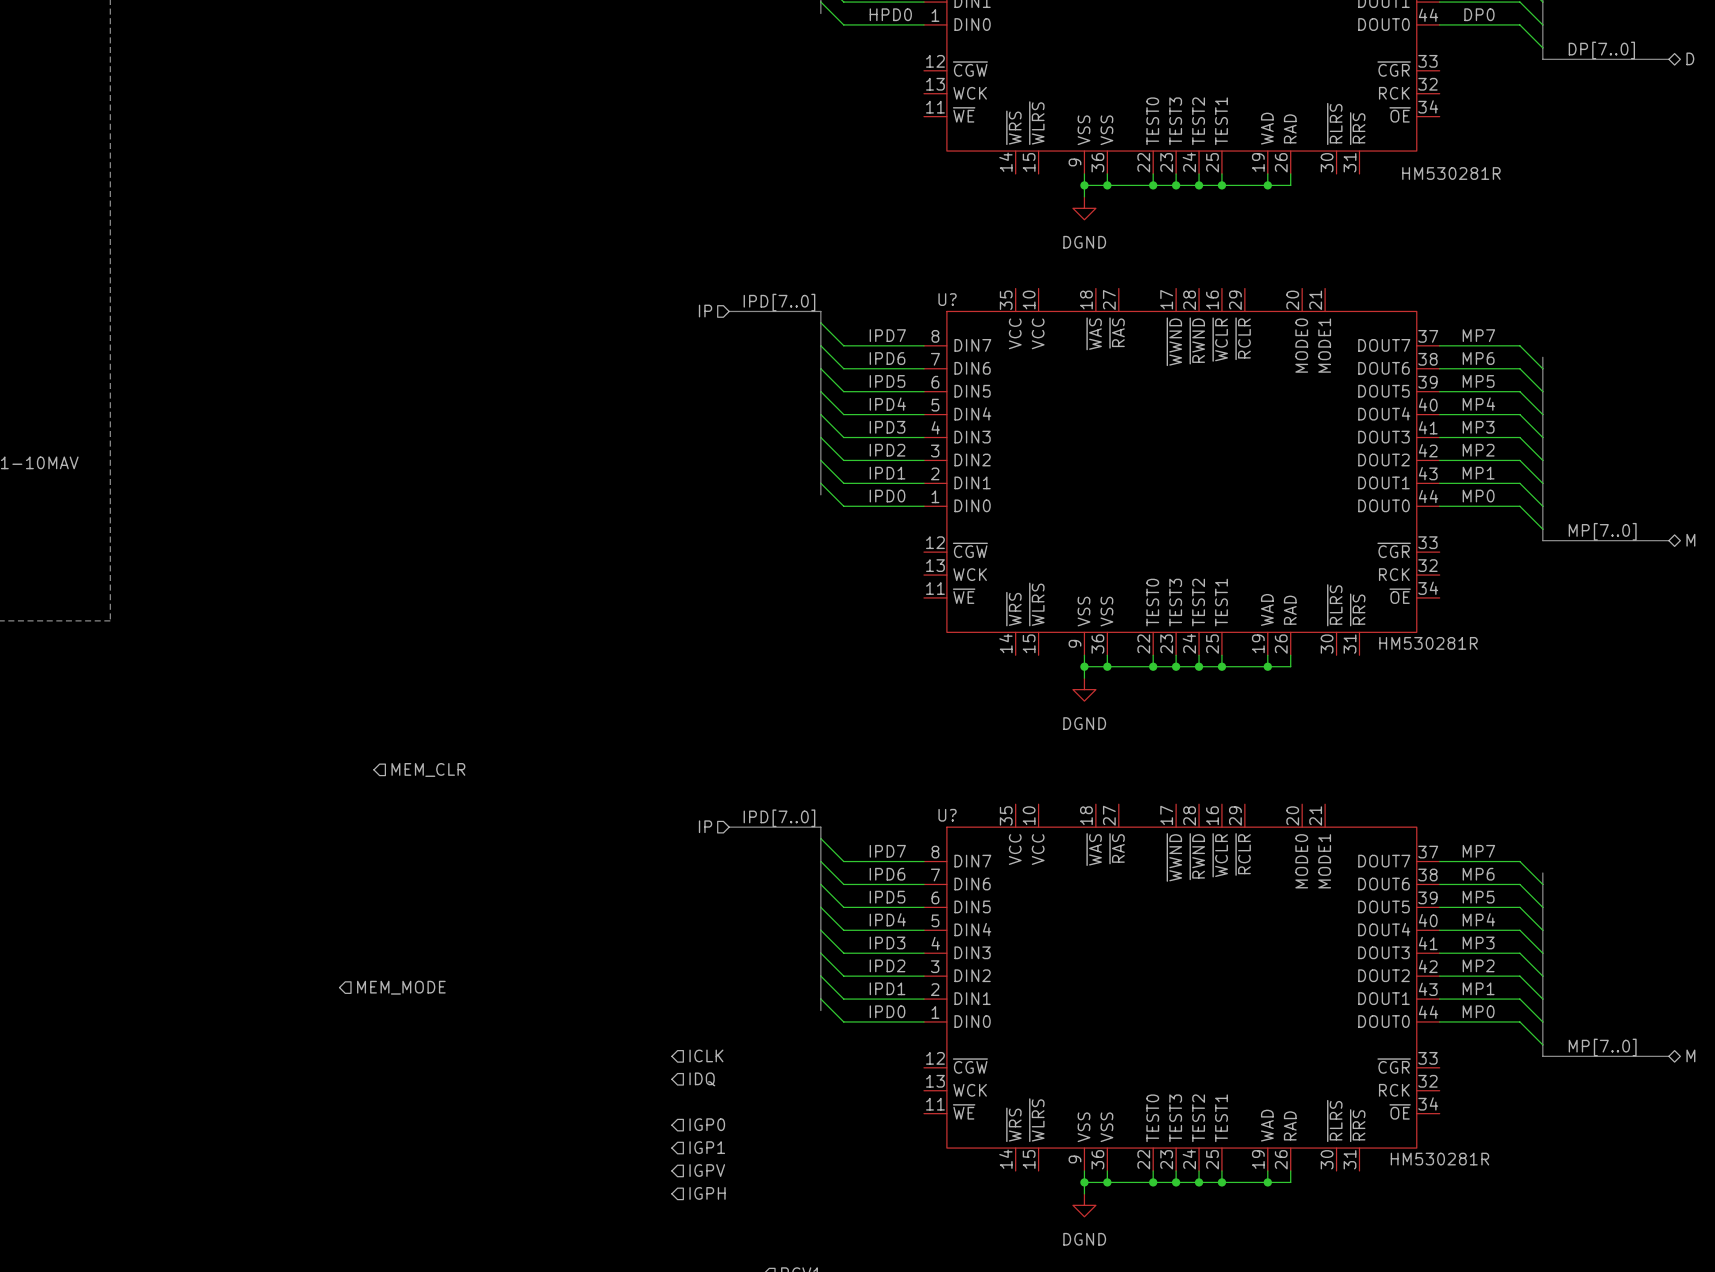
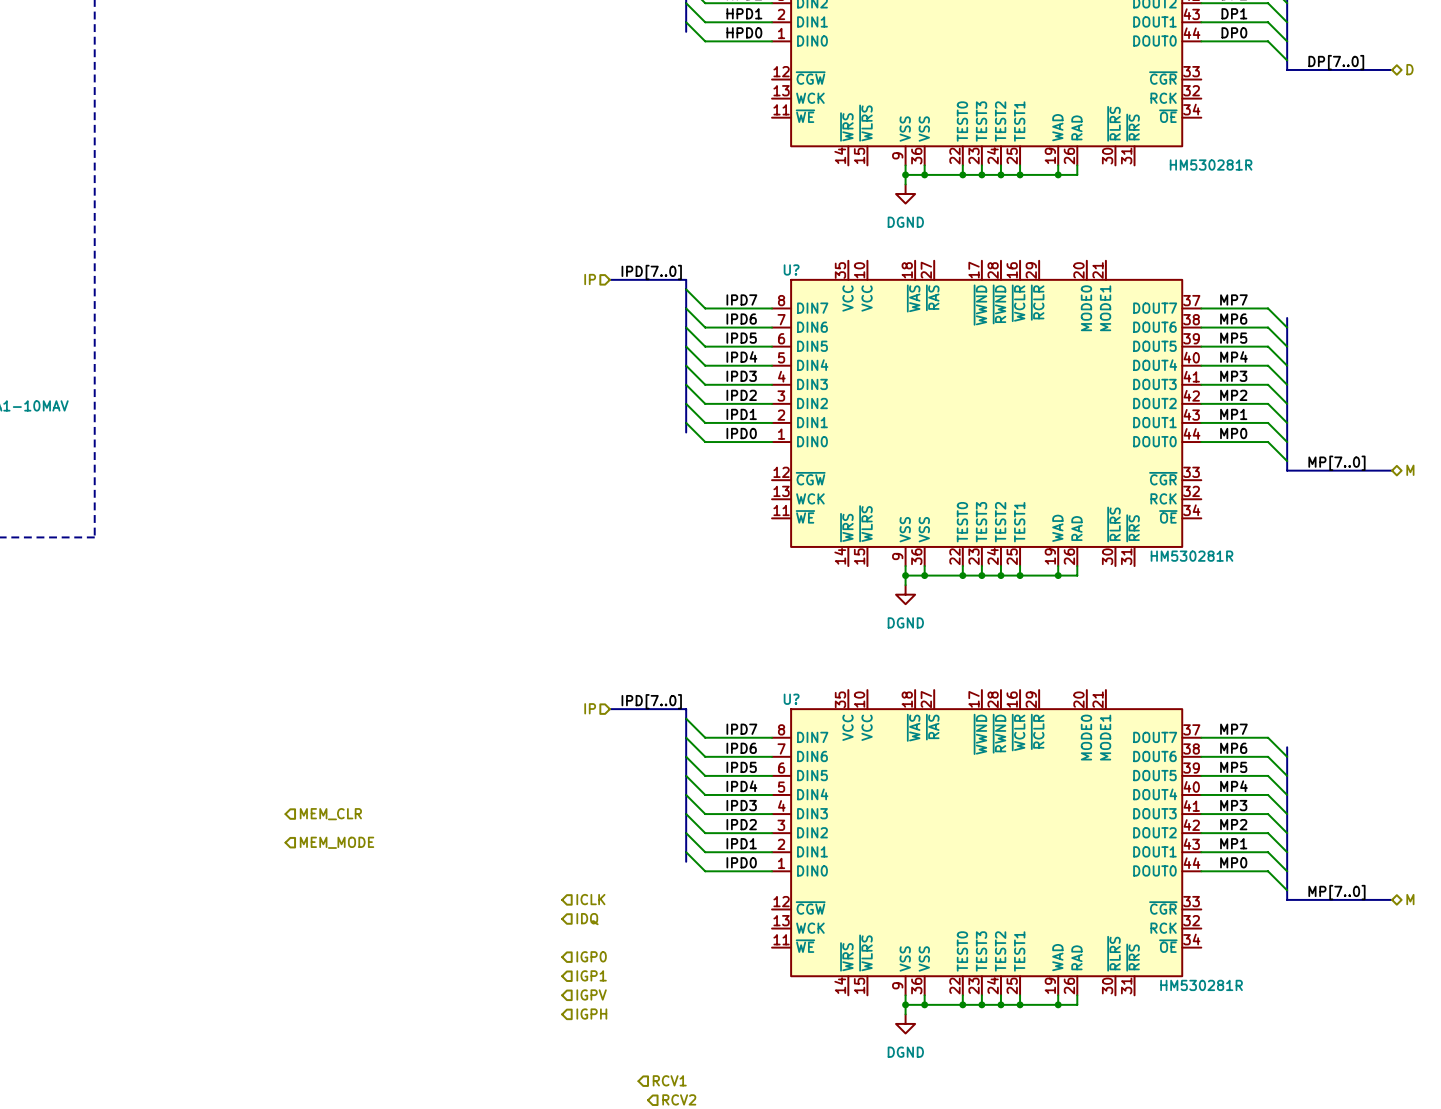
hierarchical label position: MEM_CLR (428, 769) -> MEM_CLR (330, 814)

